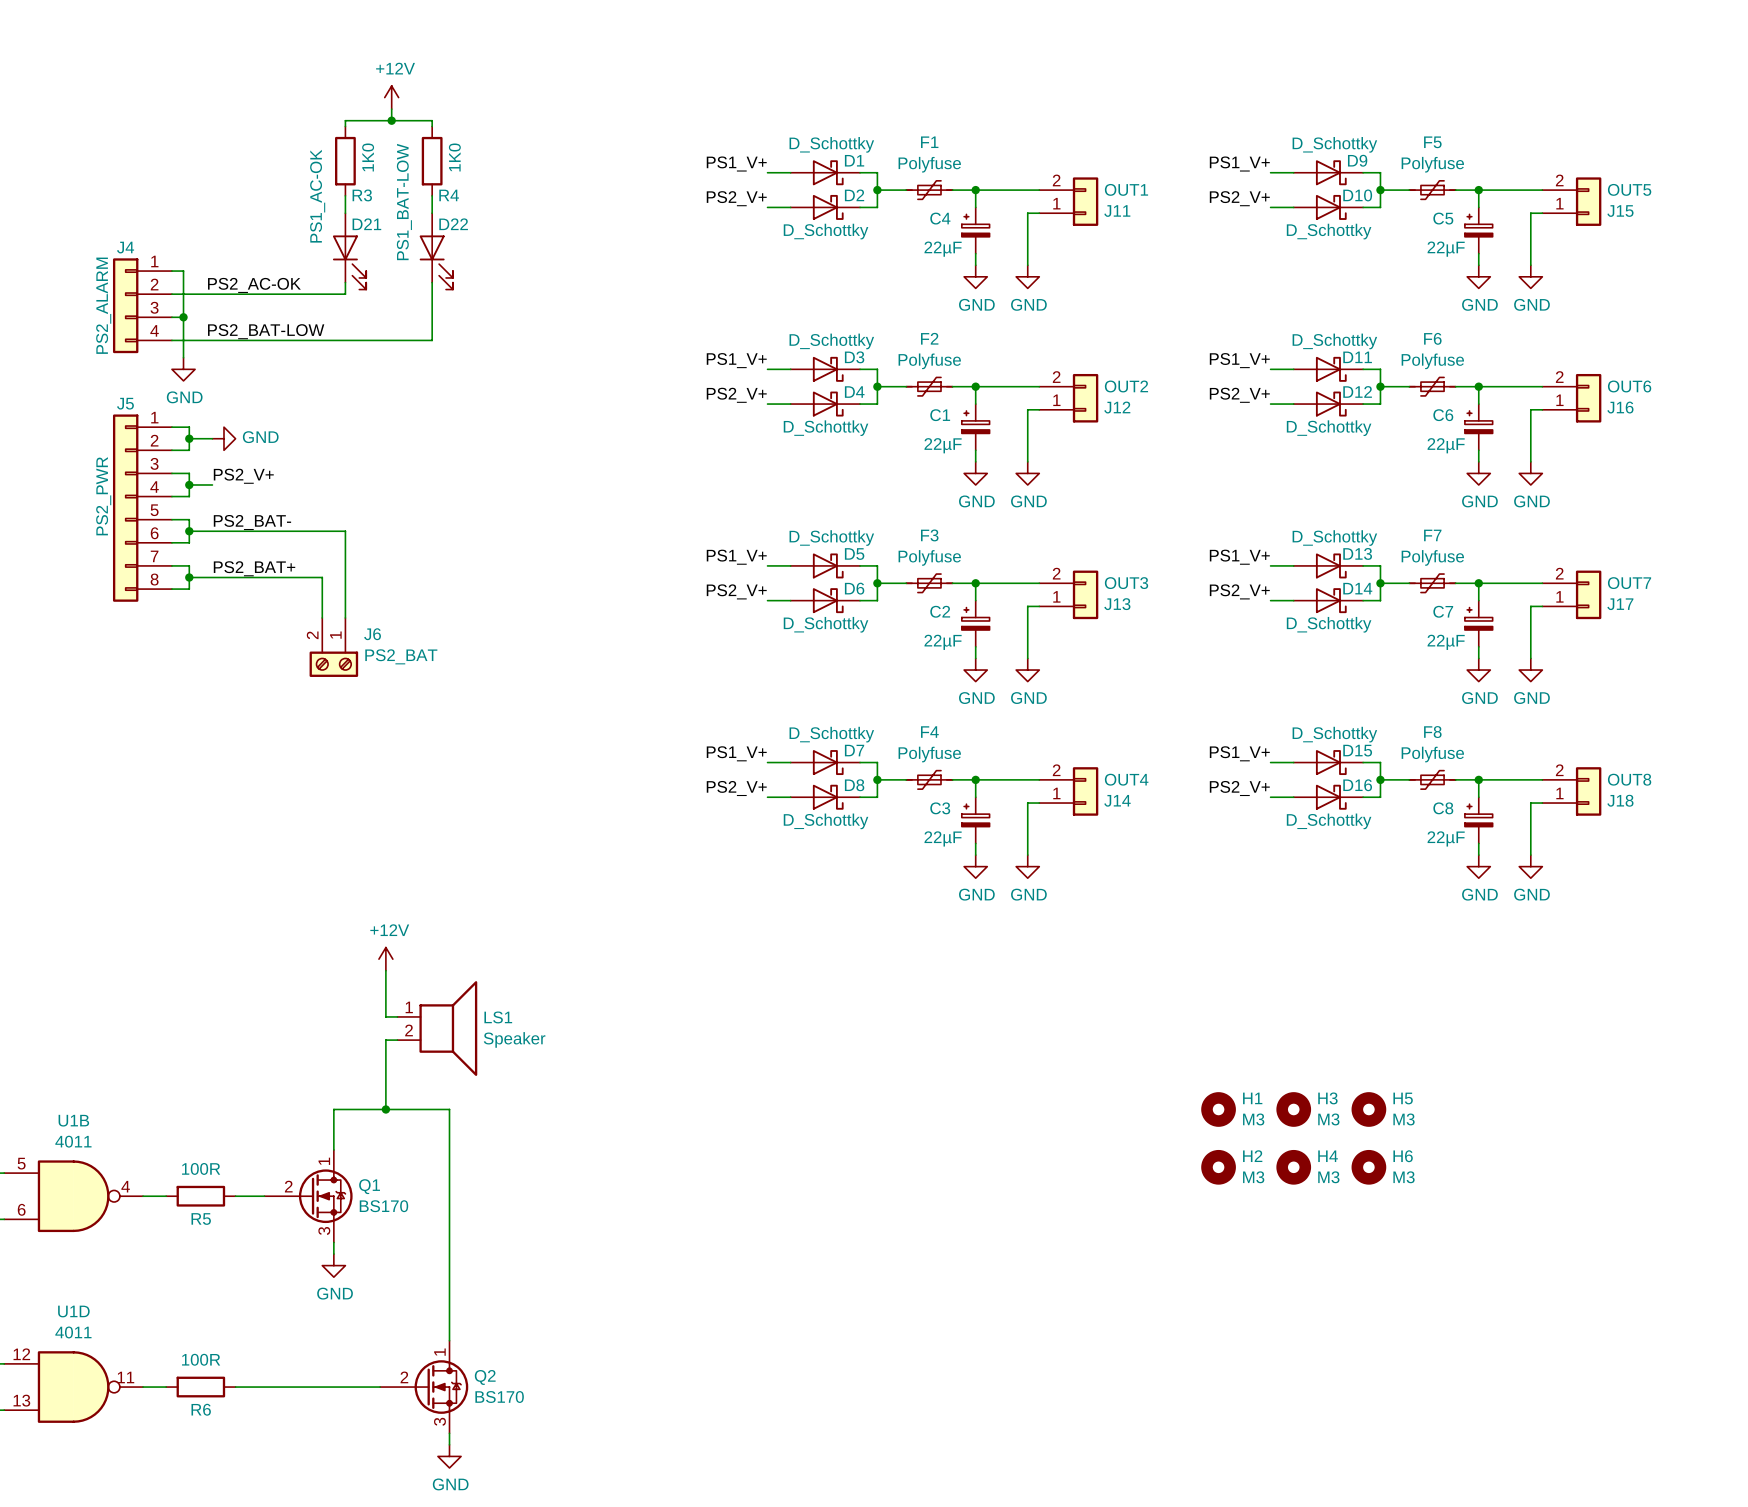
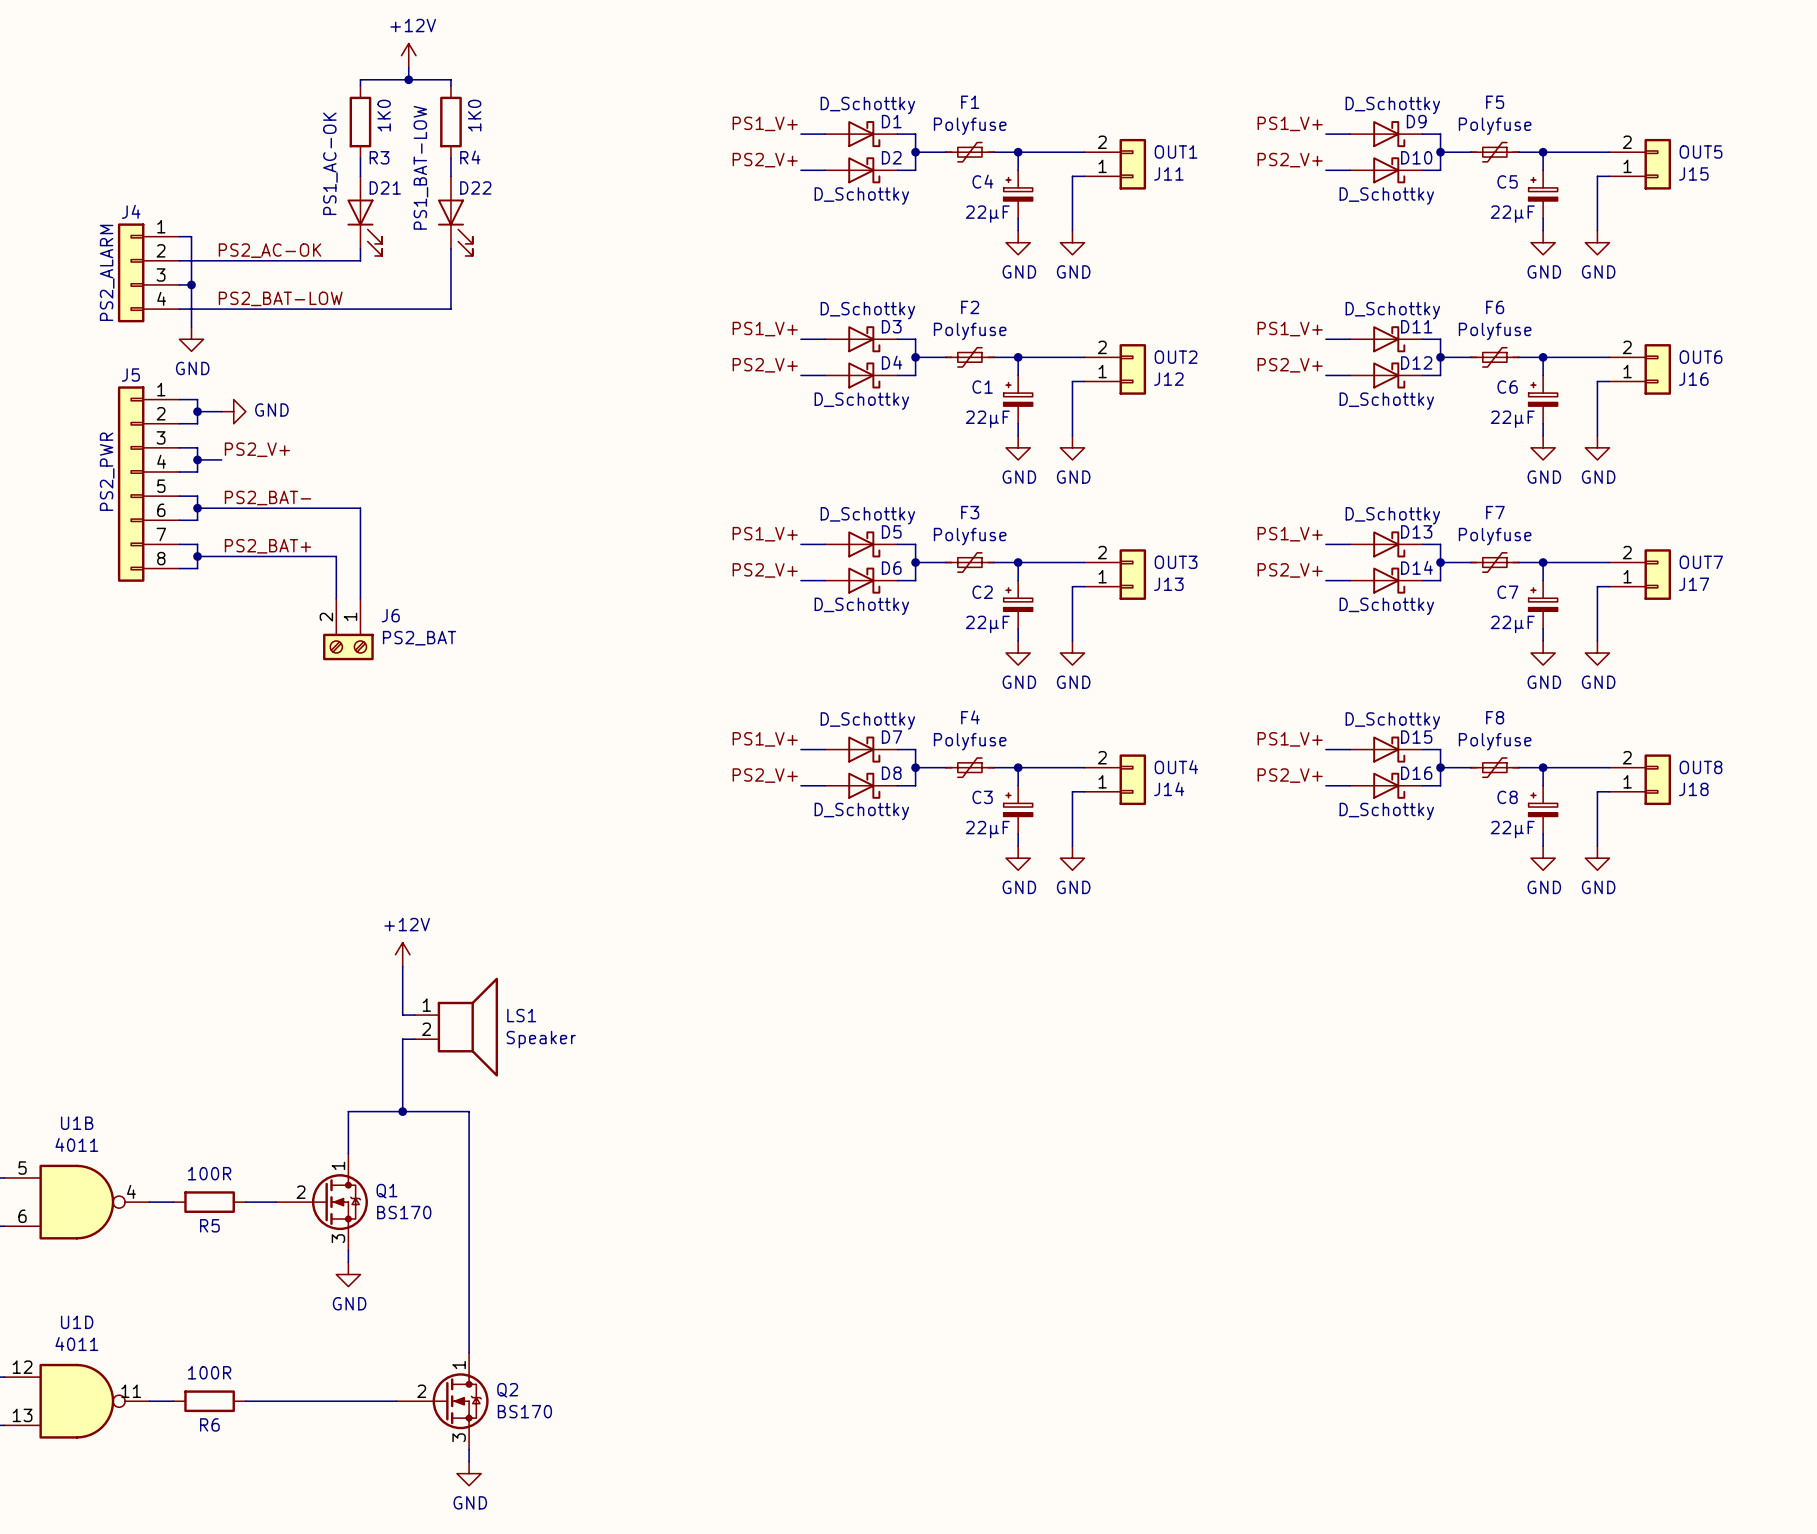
H1: M3 (1218, 1109) -> none
H3: M3 (1293, 1109) -> none
H5: M3 (1368, 1109) -> none
H2: M3 (1218, 1167) -> none
H4: M3 (1293, 1167) -> none
H6: M3 (1368, 1167) -> none

